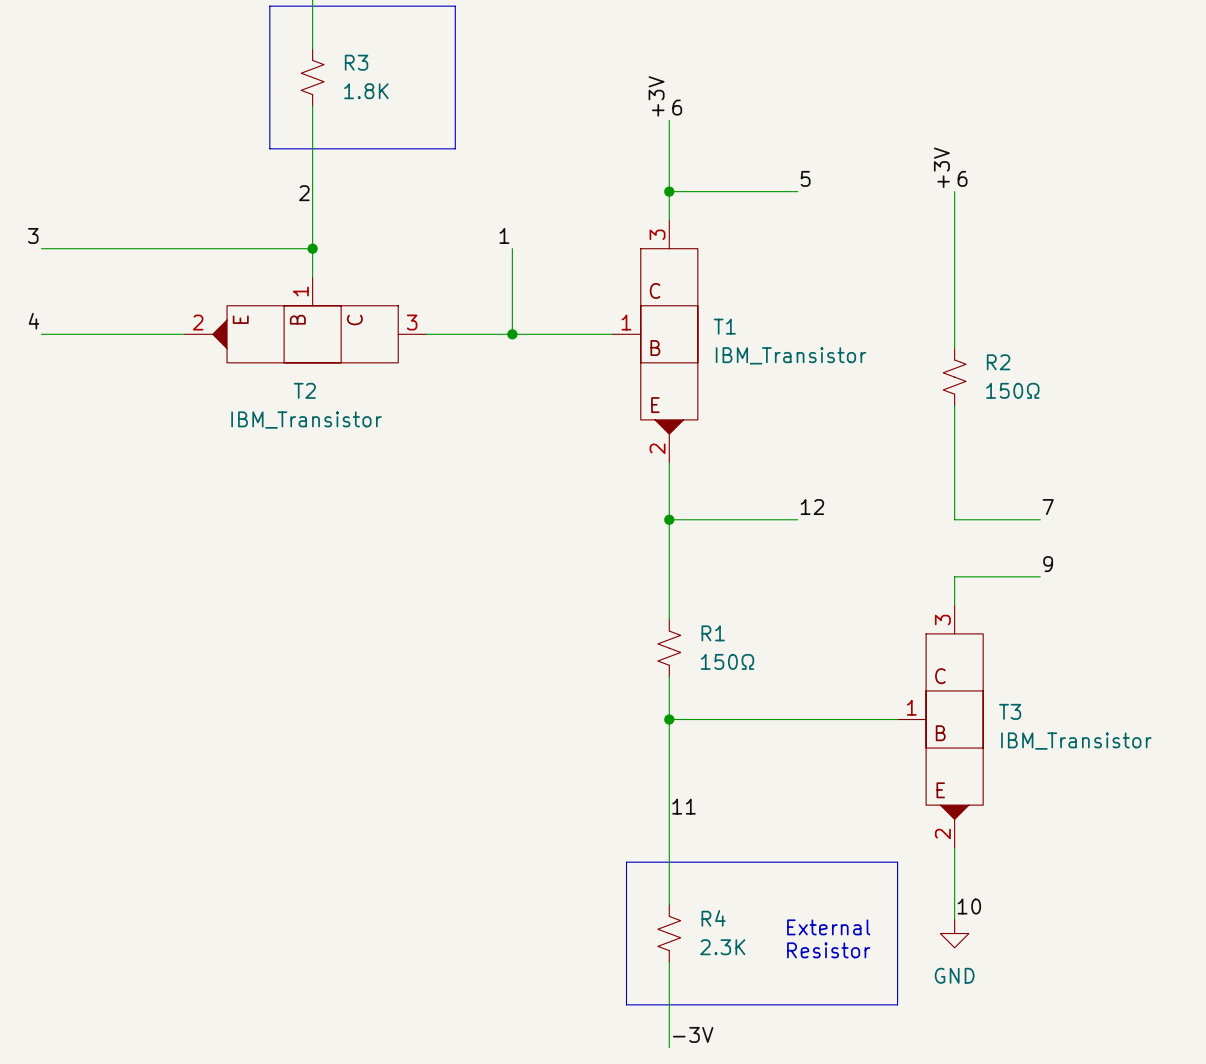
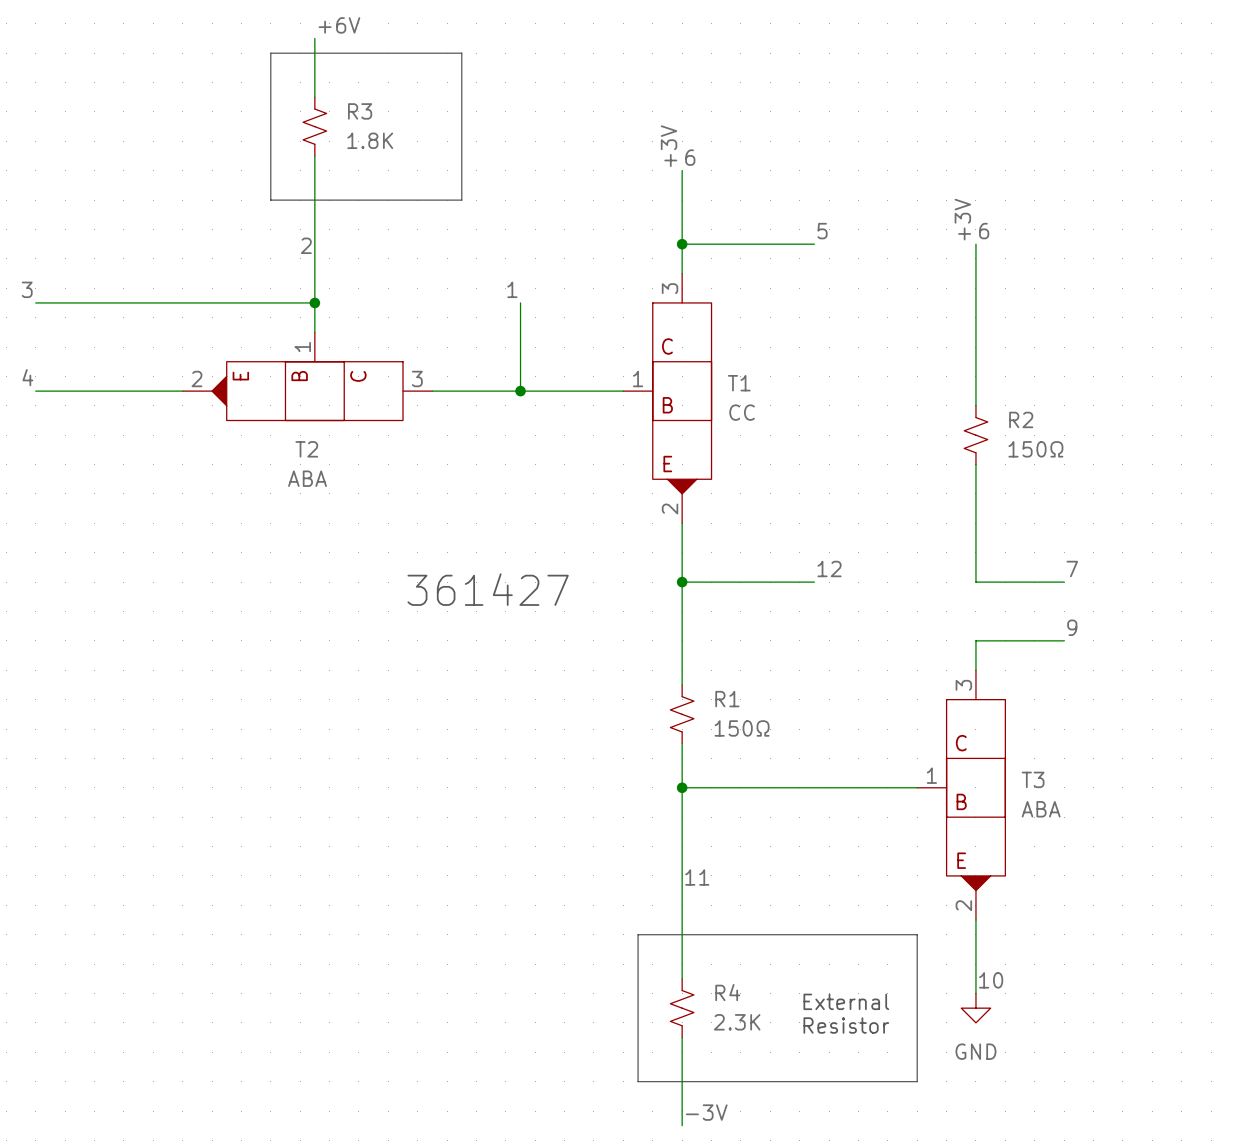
T1 value: IBM_Transistor (791, 355) -> CC (742, 412)
T2 value: IBM_Transistor (306, 420) -> ABA (307, 478)
text: none -> 361427 (488, 589)
T3 value: IBM_Transistor (1076, 741) -> ABA (1041, 809)

